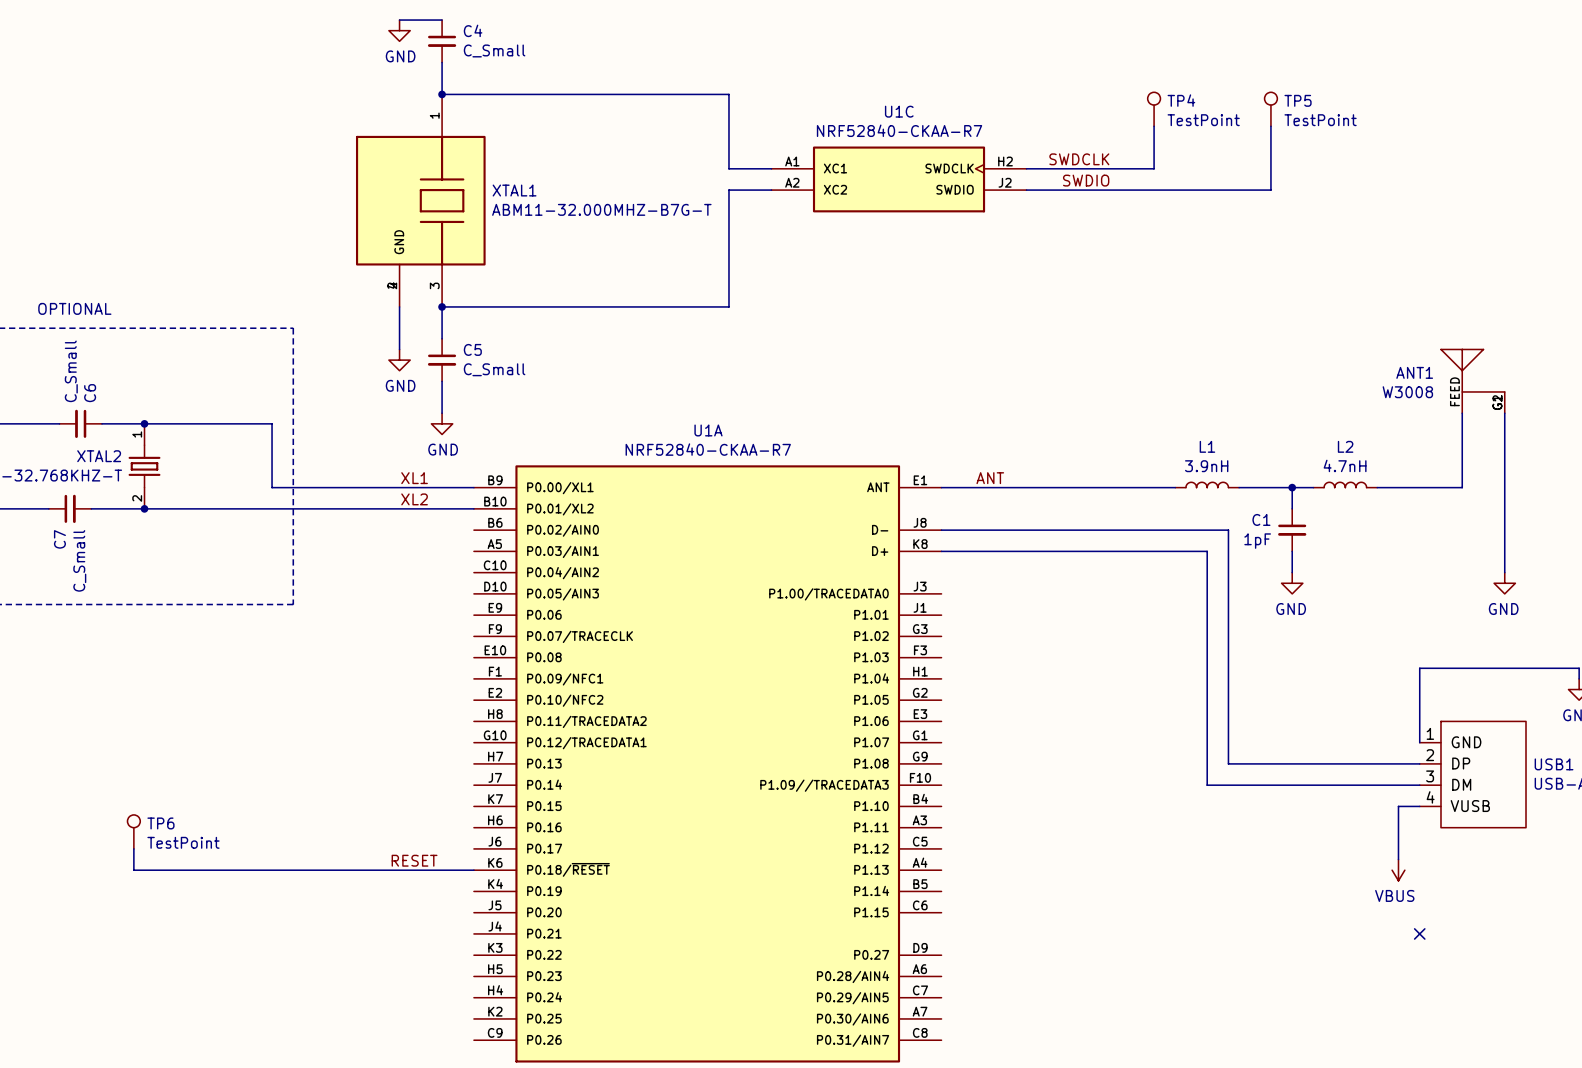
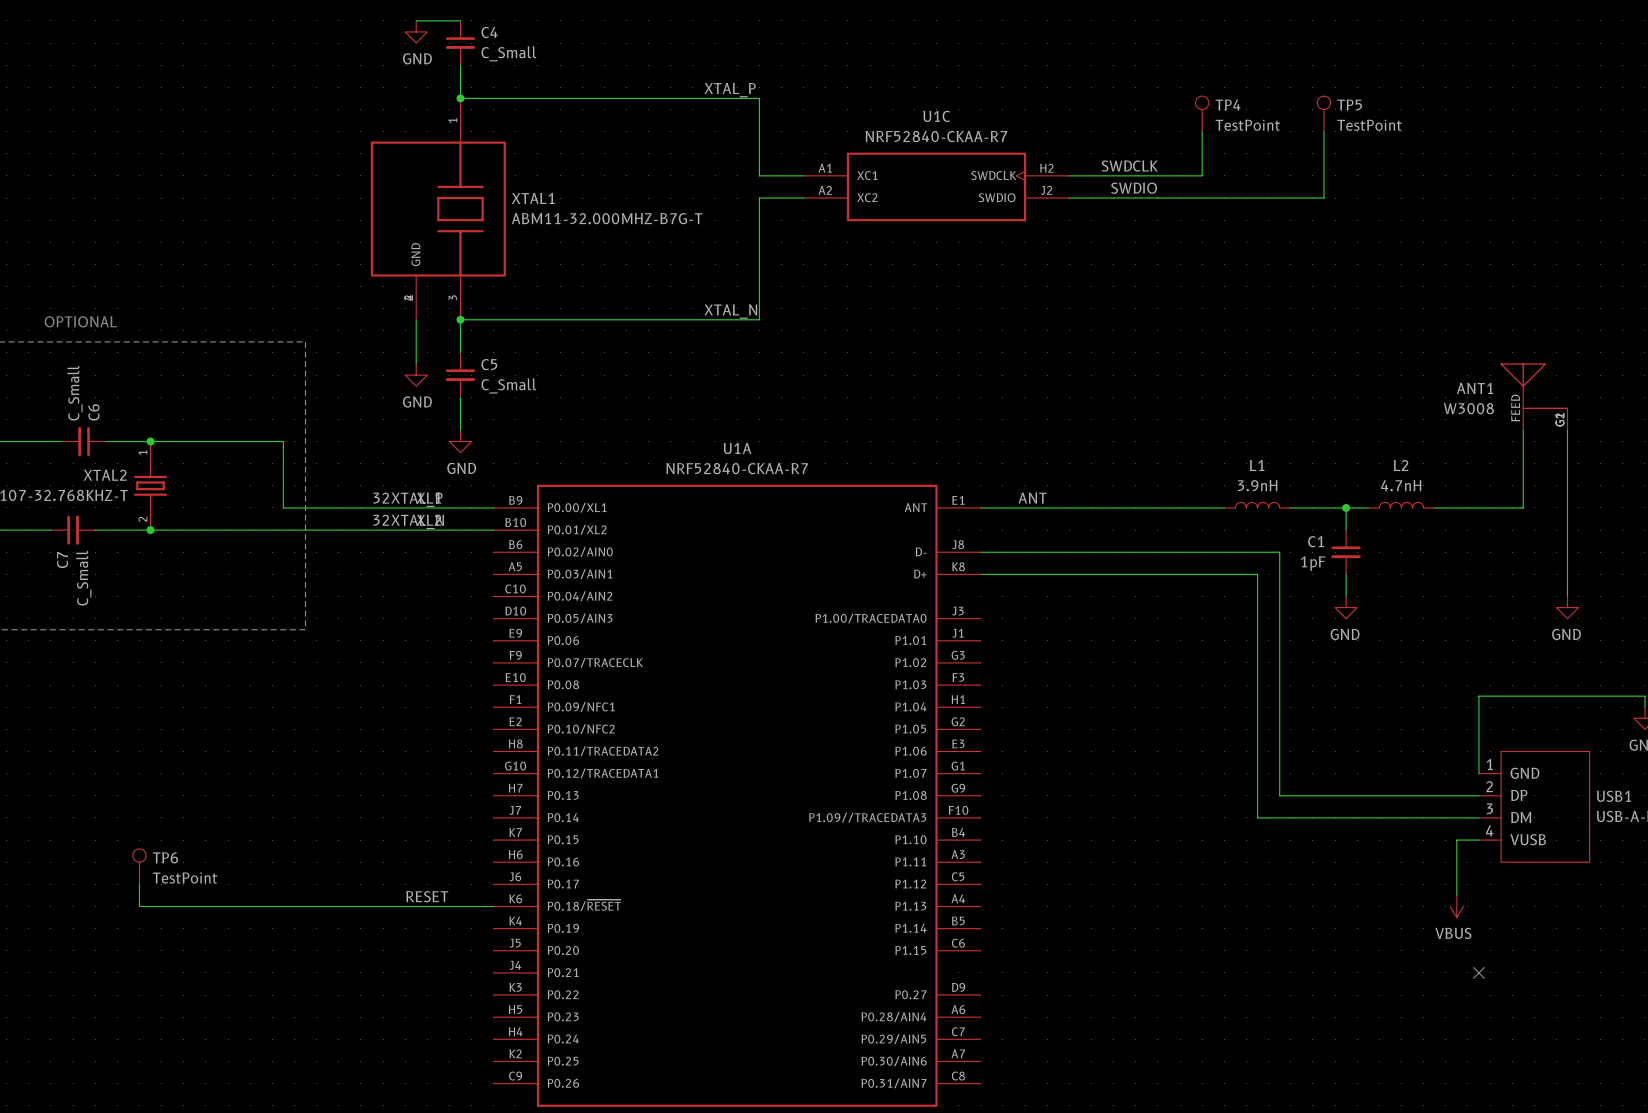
label: none -> XTAL_P (730, 90)
label: none -> XTAL_N (730, 311)
label: none -> 32XTAL_P (407, 499)
label: none -> 32XTAL_N (408, 521)

